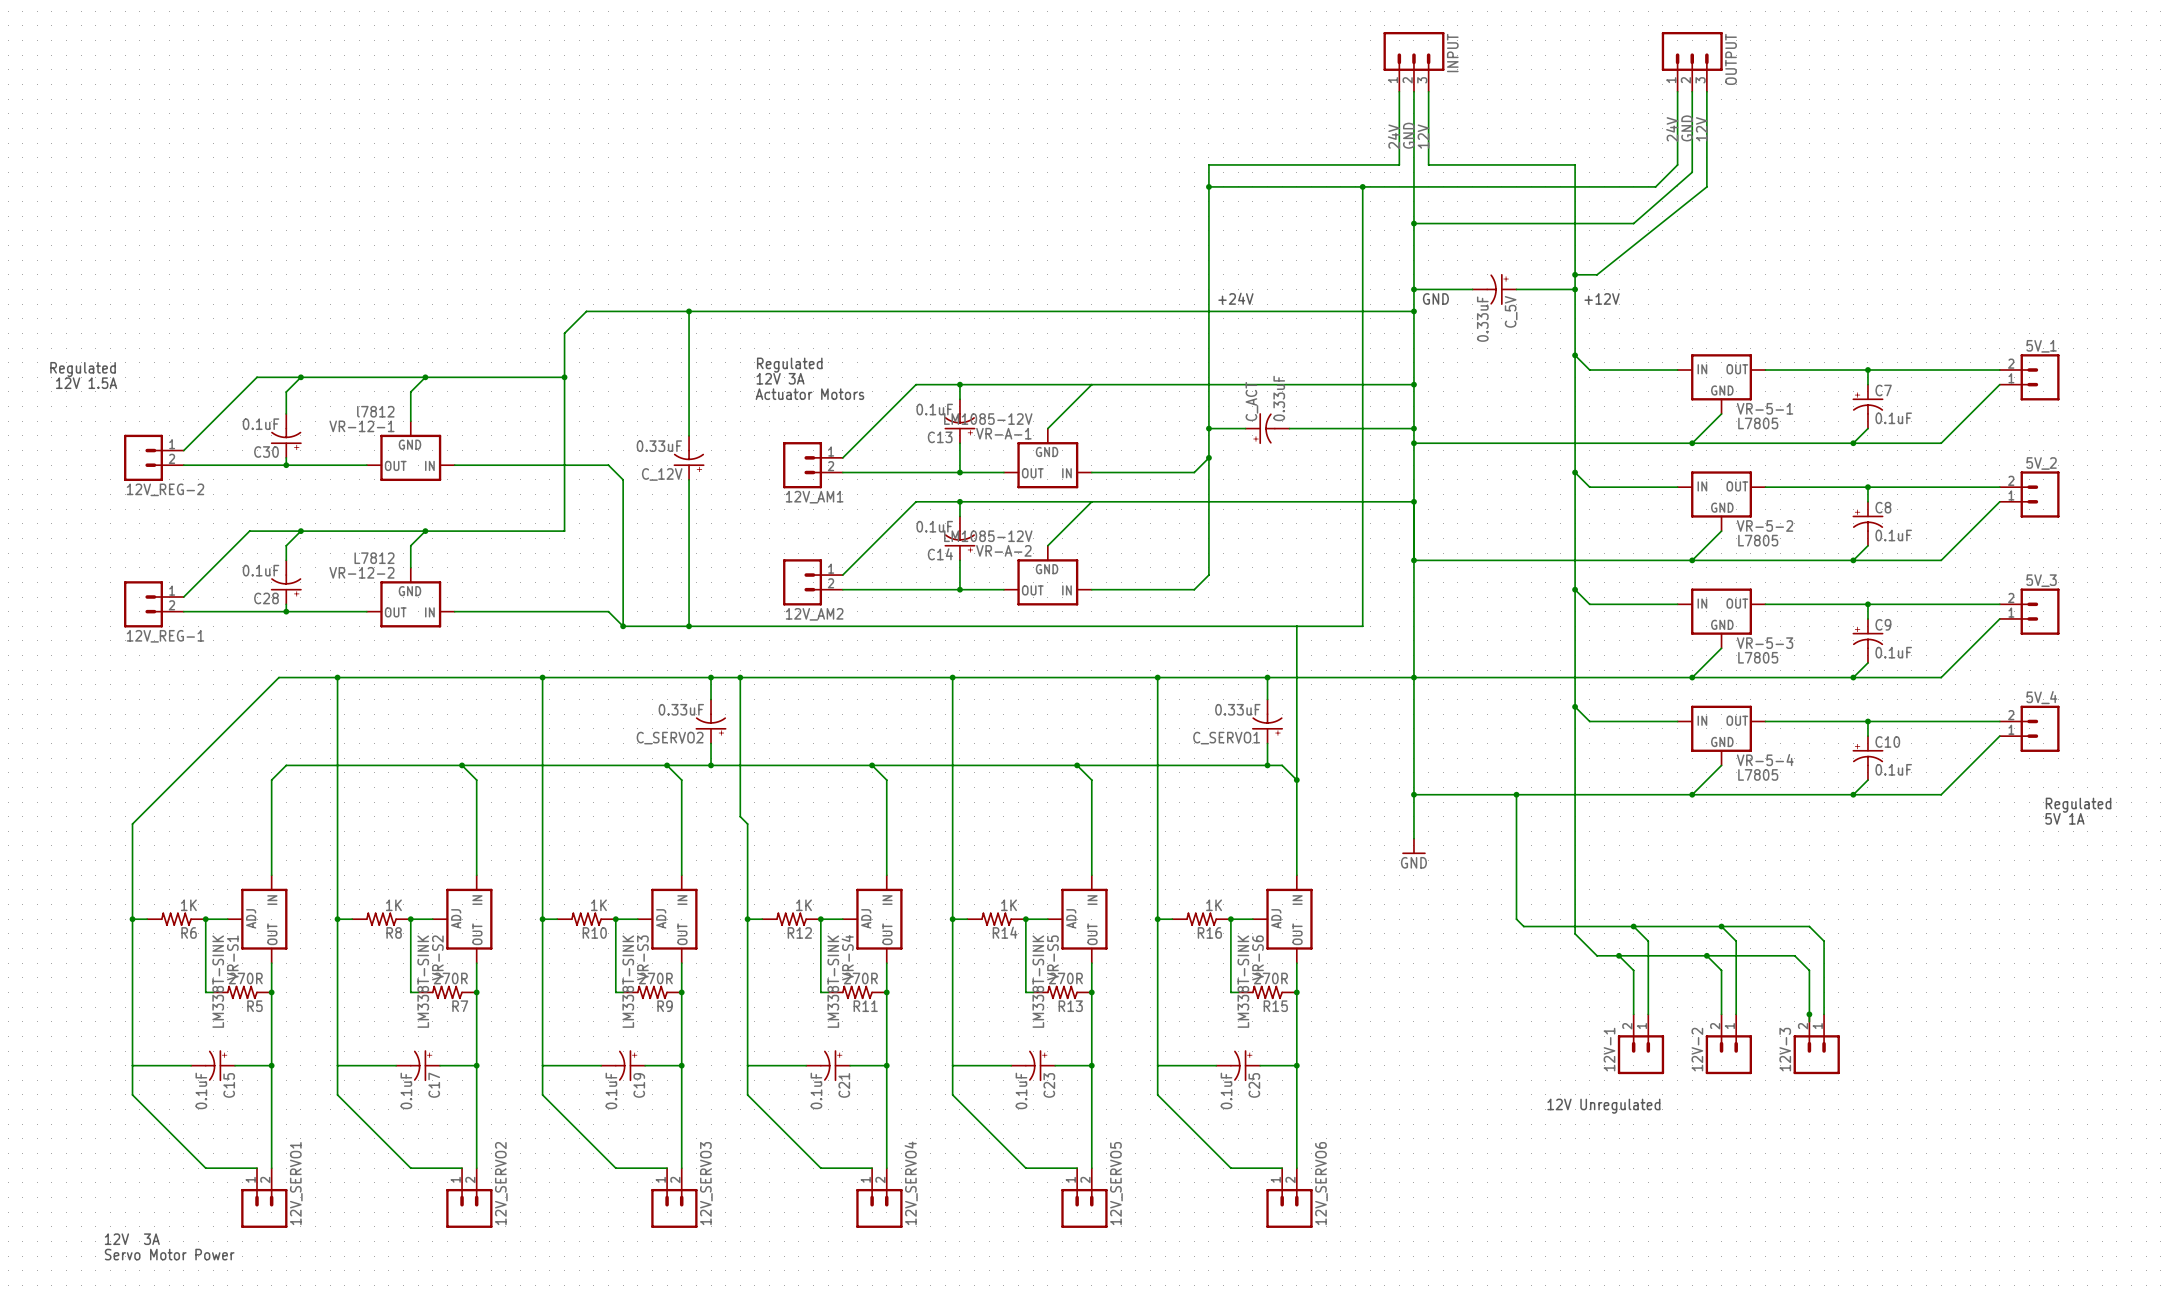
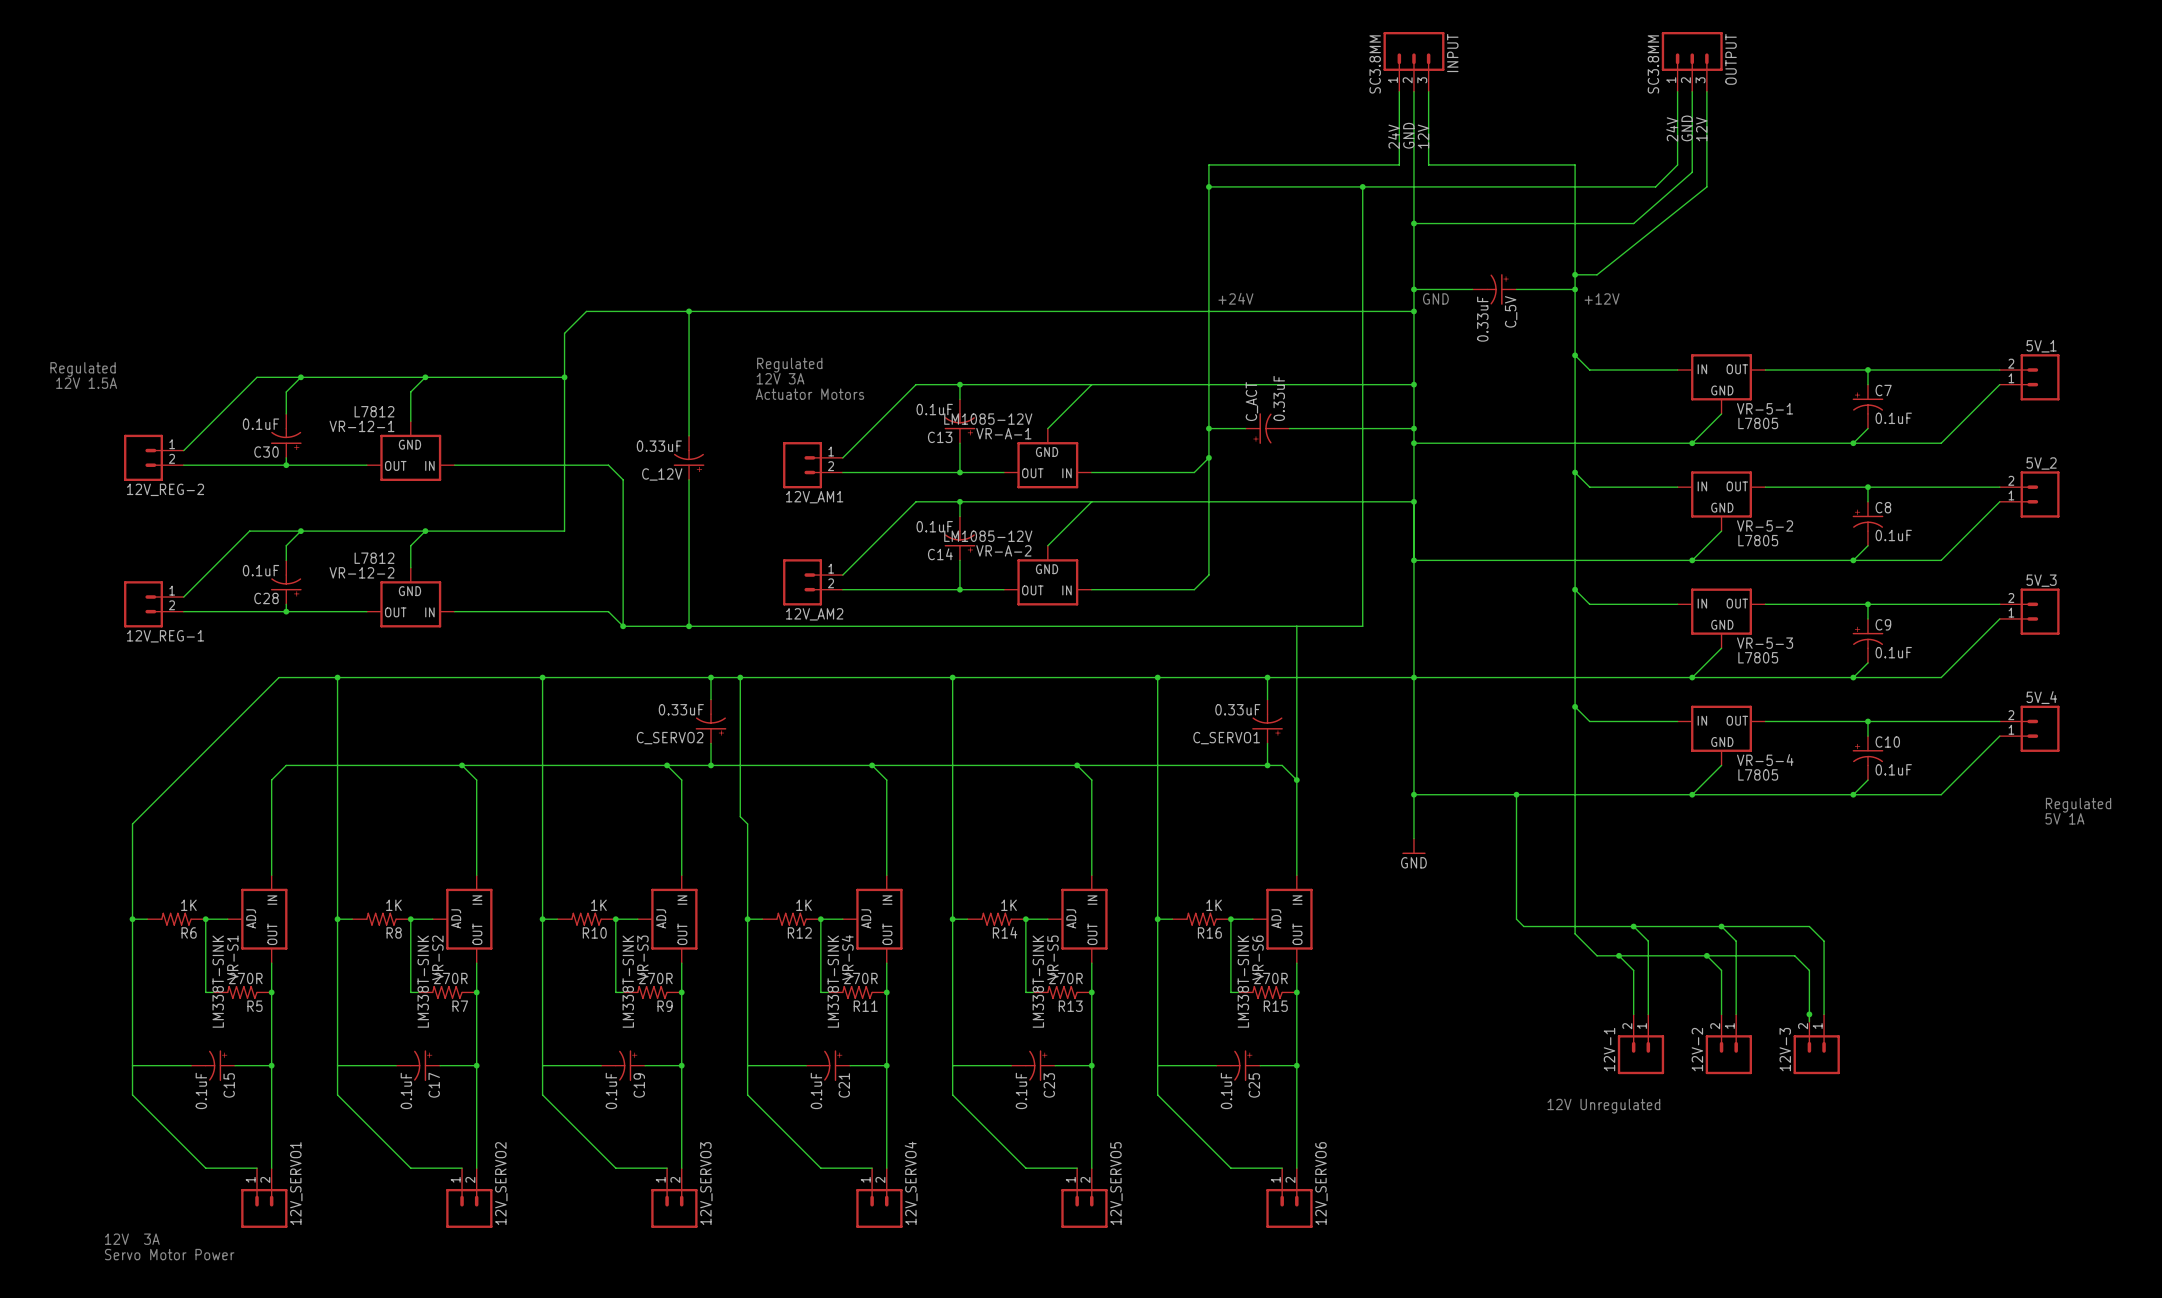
INPUT value: none -> SC3.8MM (1375, 64)
OUTPUT value: none -> SC3.8MM (1653, 64)
VR-12-1 value: l7812 (375, 411) -> L7812 (374, 411)

